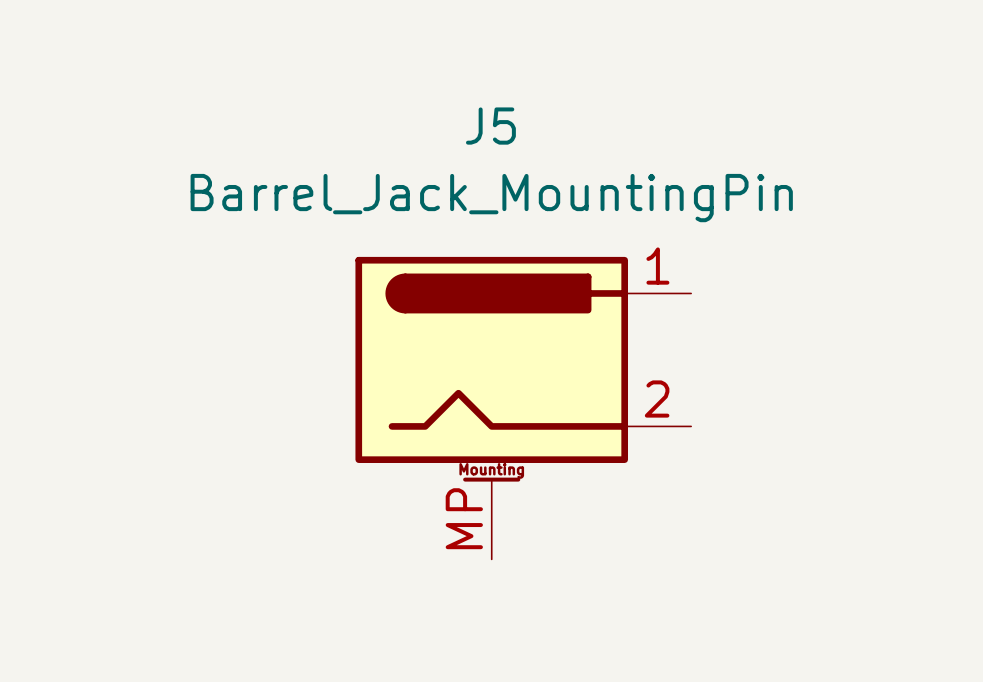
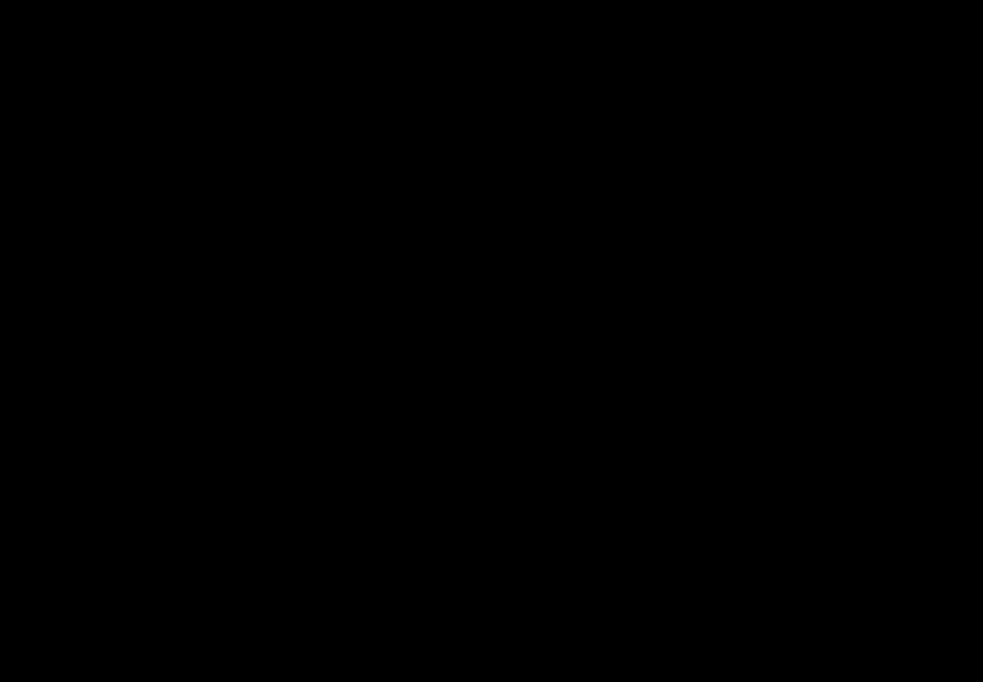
J5: Barrel_Jack_MountingPin (523, 408) -> none

